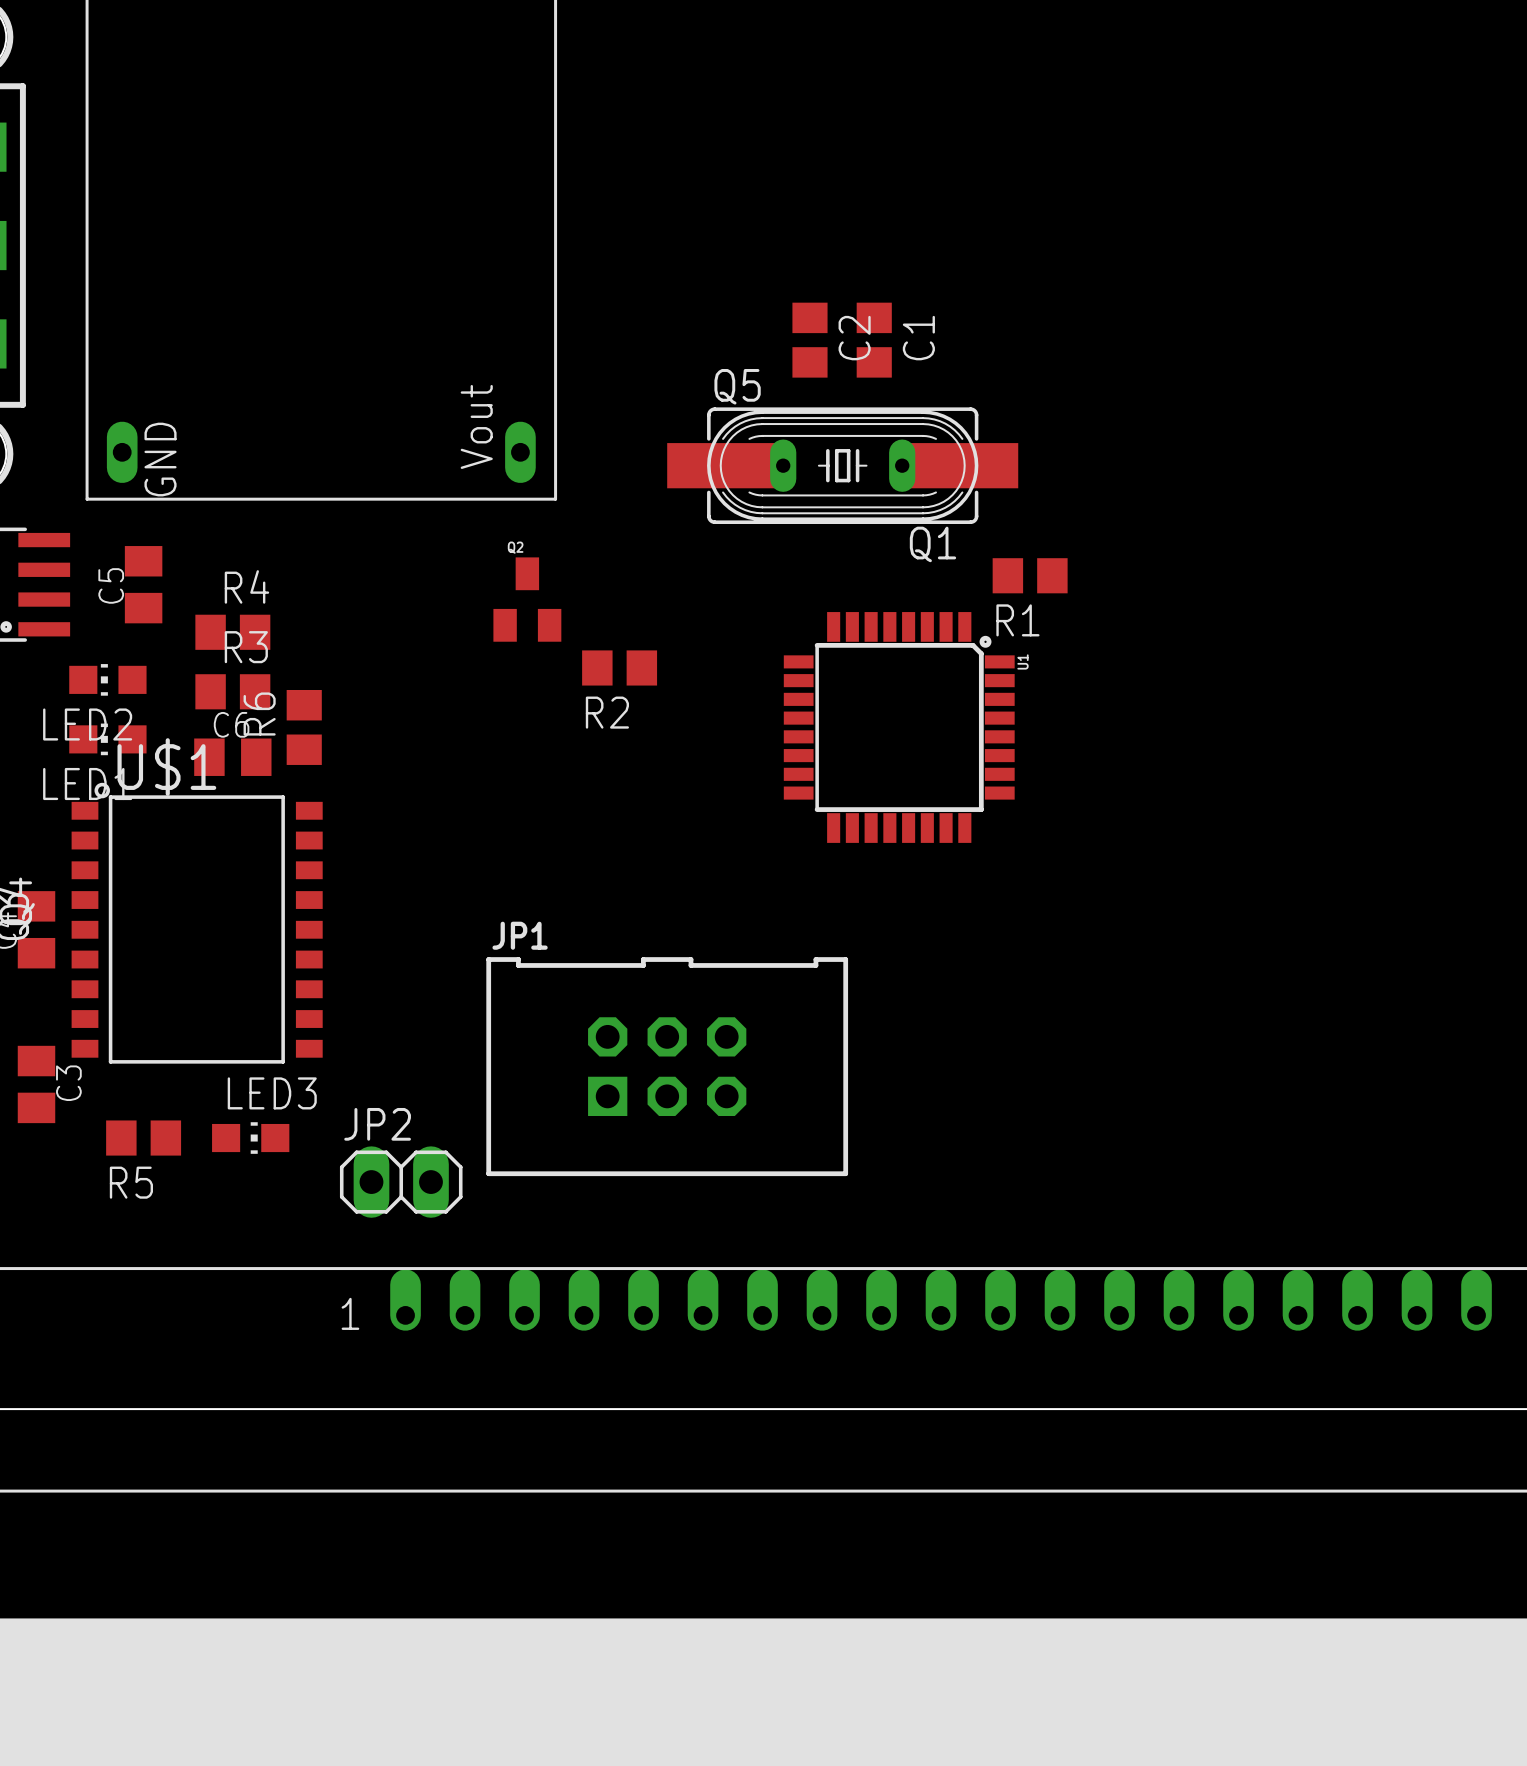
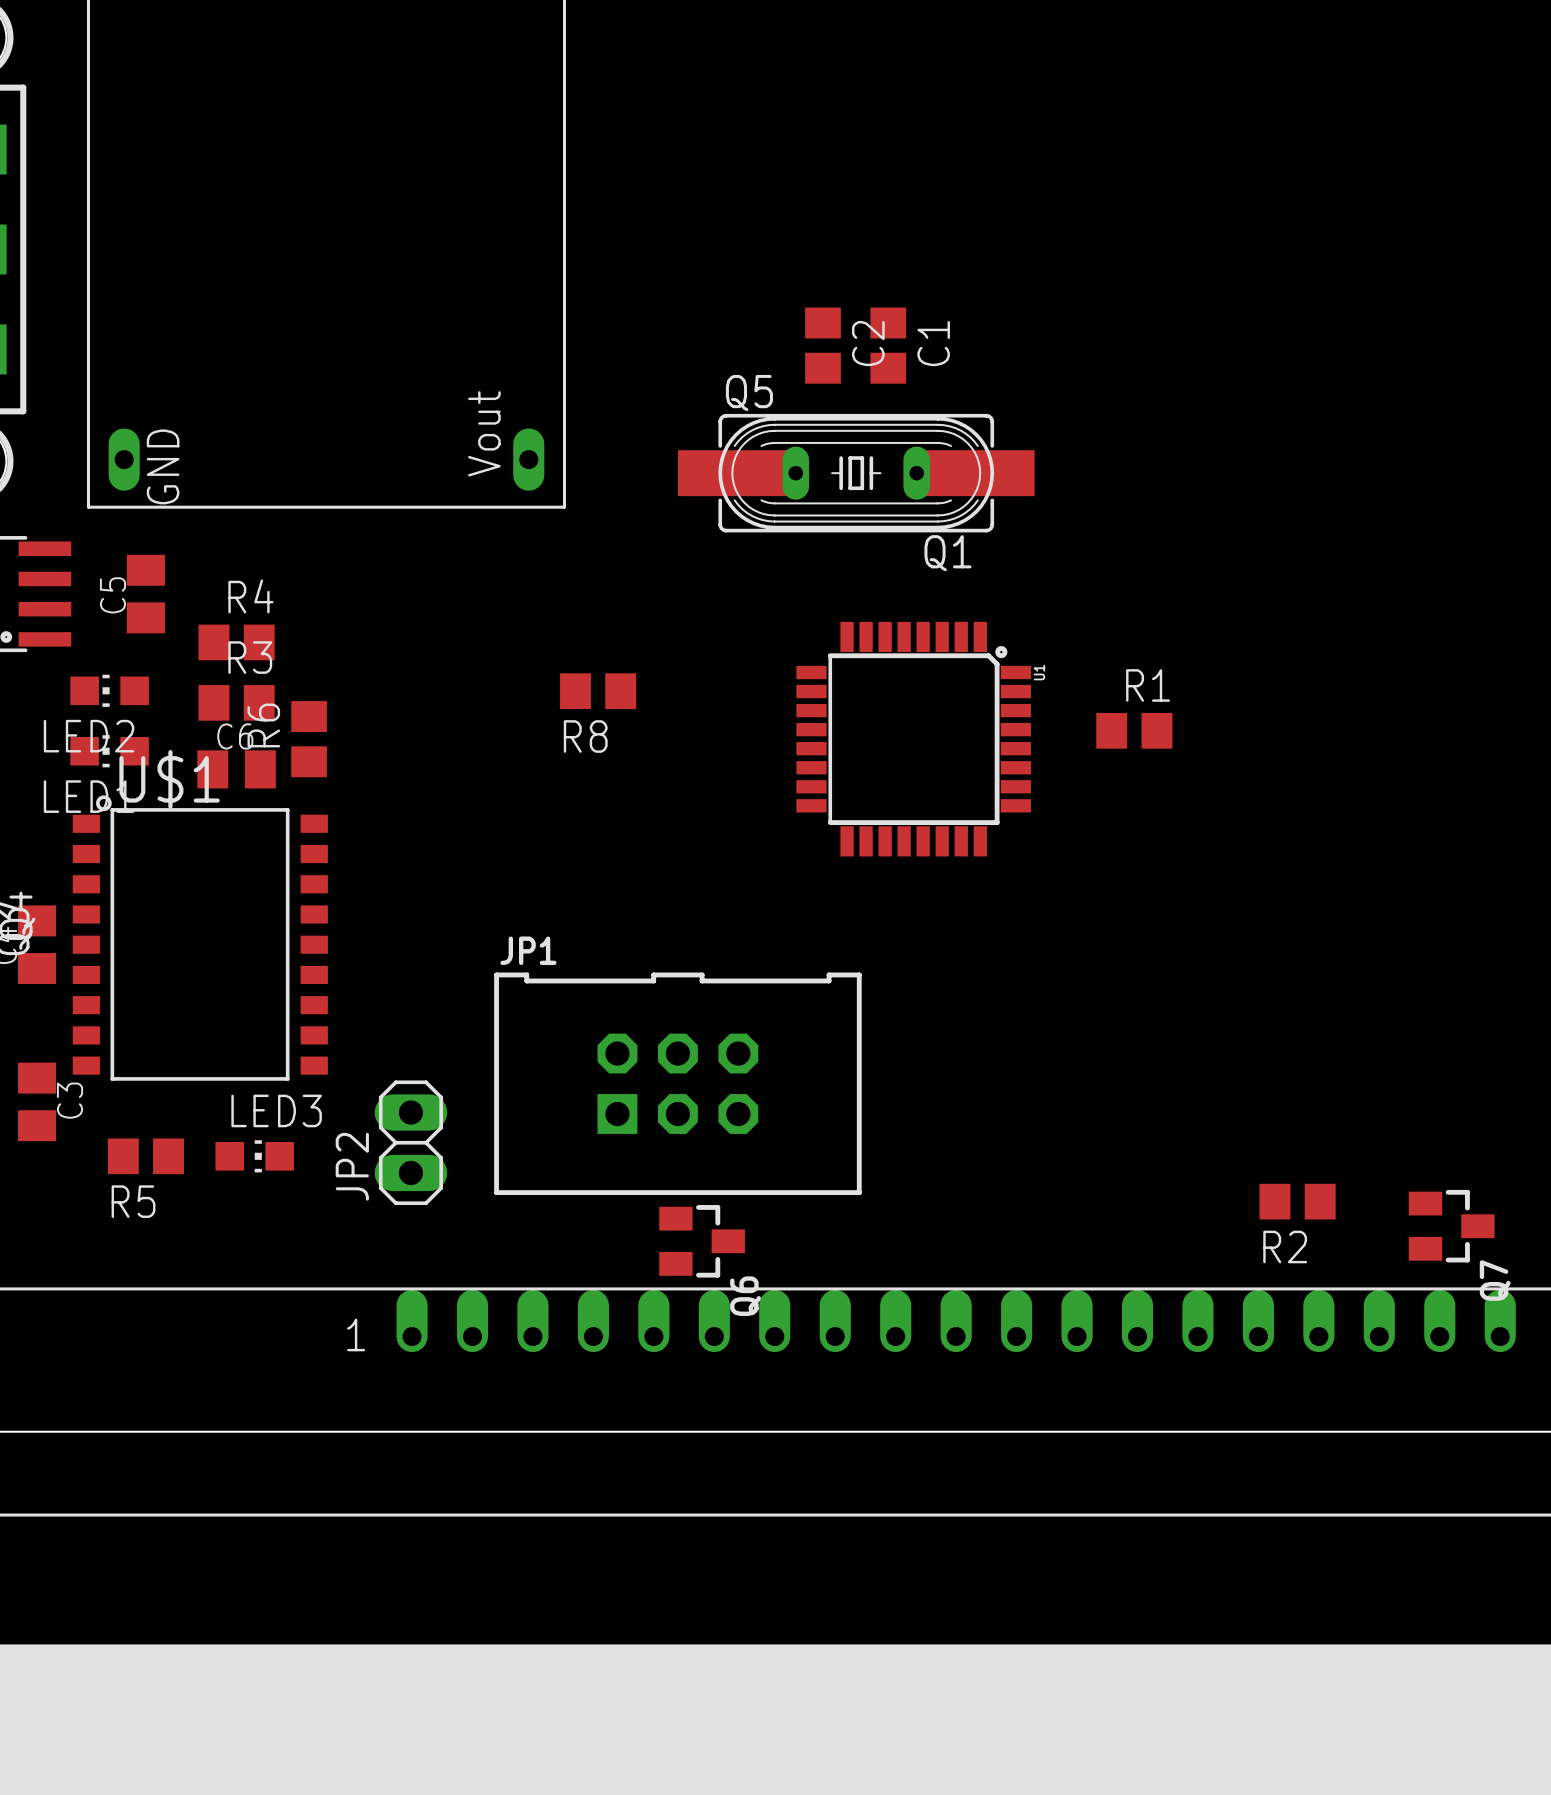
R1 position: (1030, 575) -> (1134, 730)
Q2: (527, 599) -> none
R1 name position: R1 (1017, 620) -> R1 (1148, 685)
R2 position: (619, 667) -> (1297, 1201)
R8: none -> (598, 691)
JP2 name position: JP2 (377, 1124) -> JP2 (352, 1166)
JP2 rotation: 0° (401, 1182) -> 90° clockwise (410, 1142)
Q7: none -> (1451, 1226)
Q6: none -> (702, 1241)

